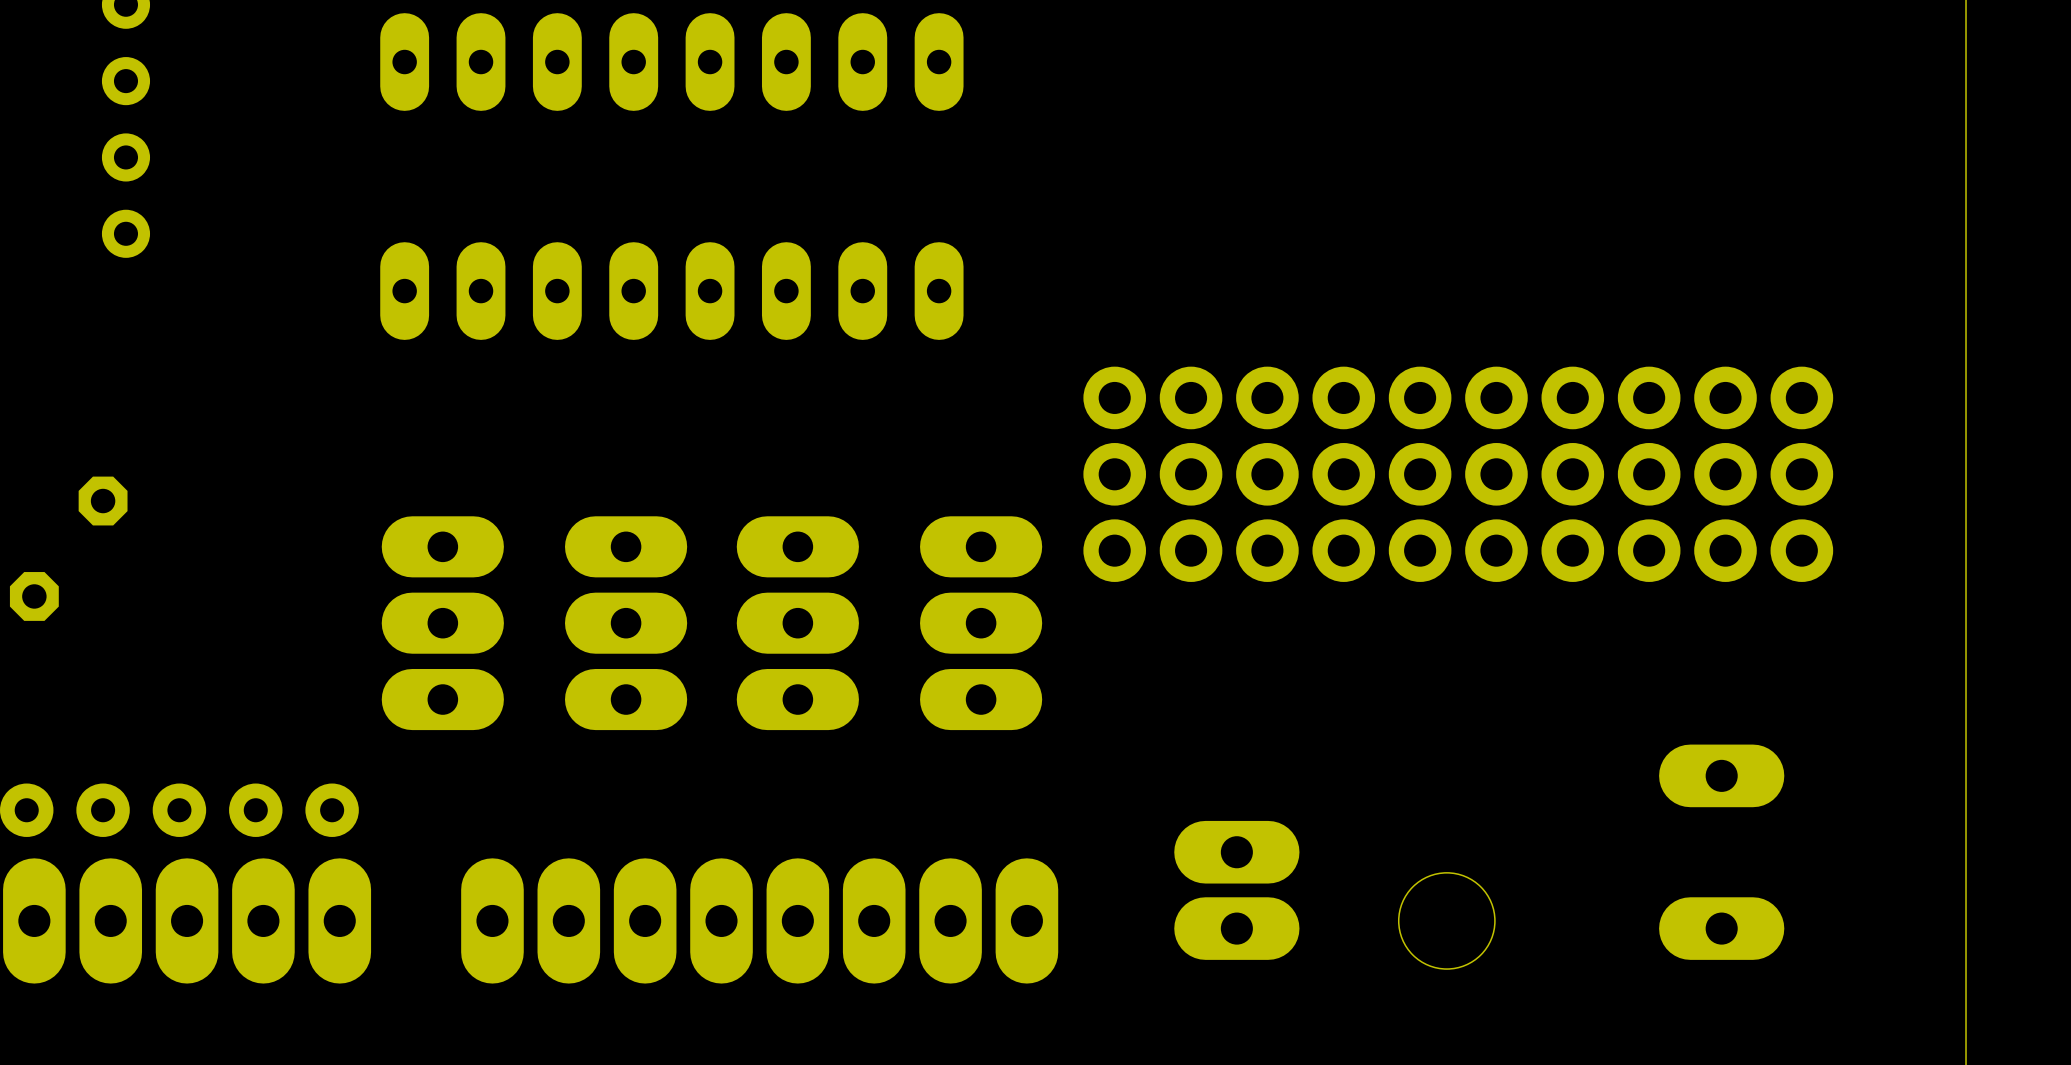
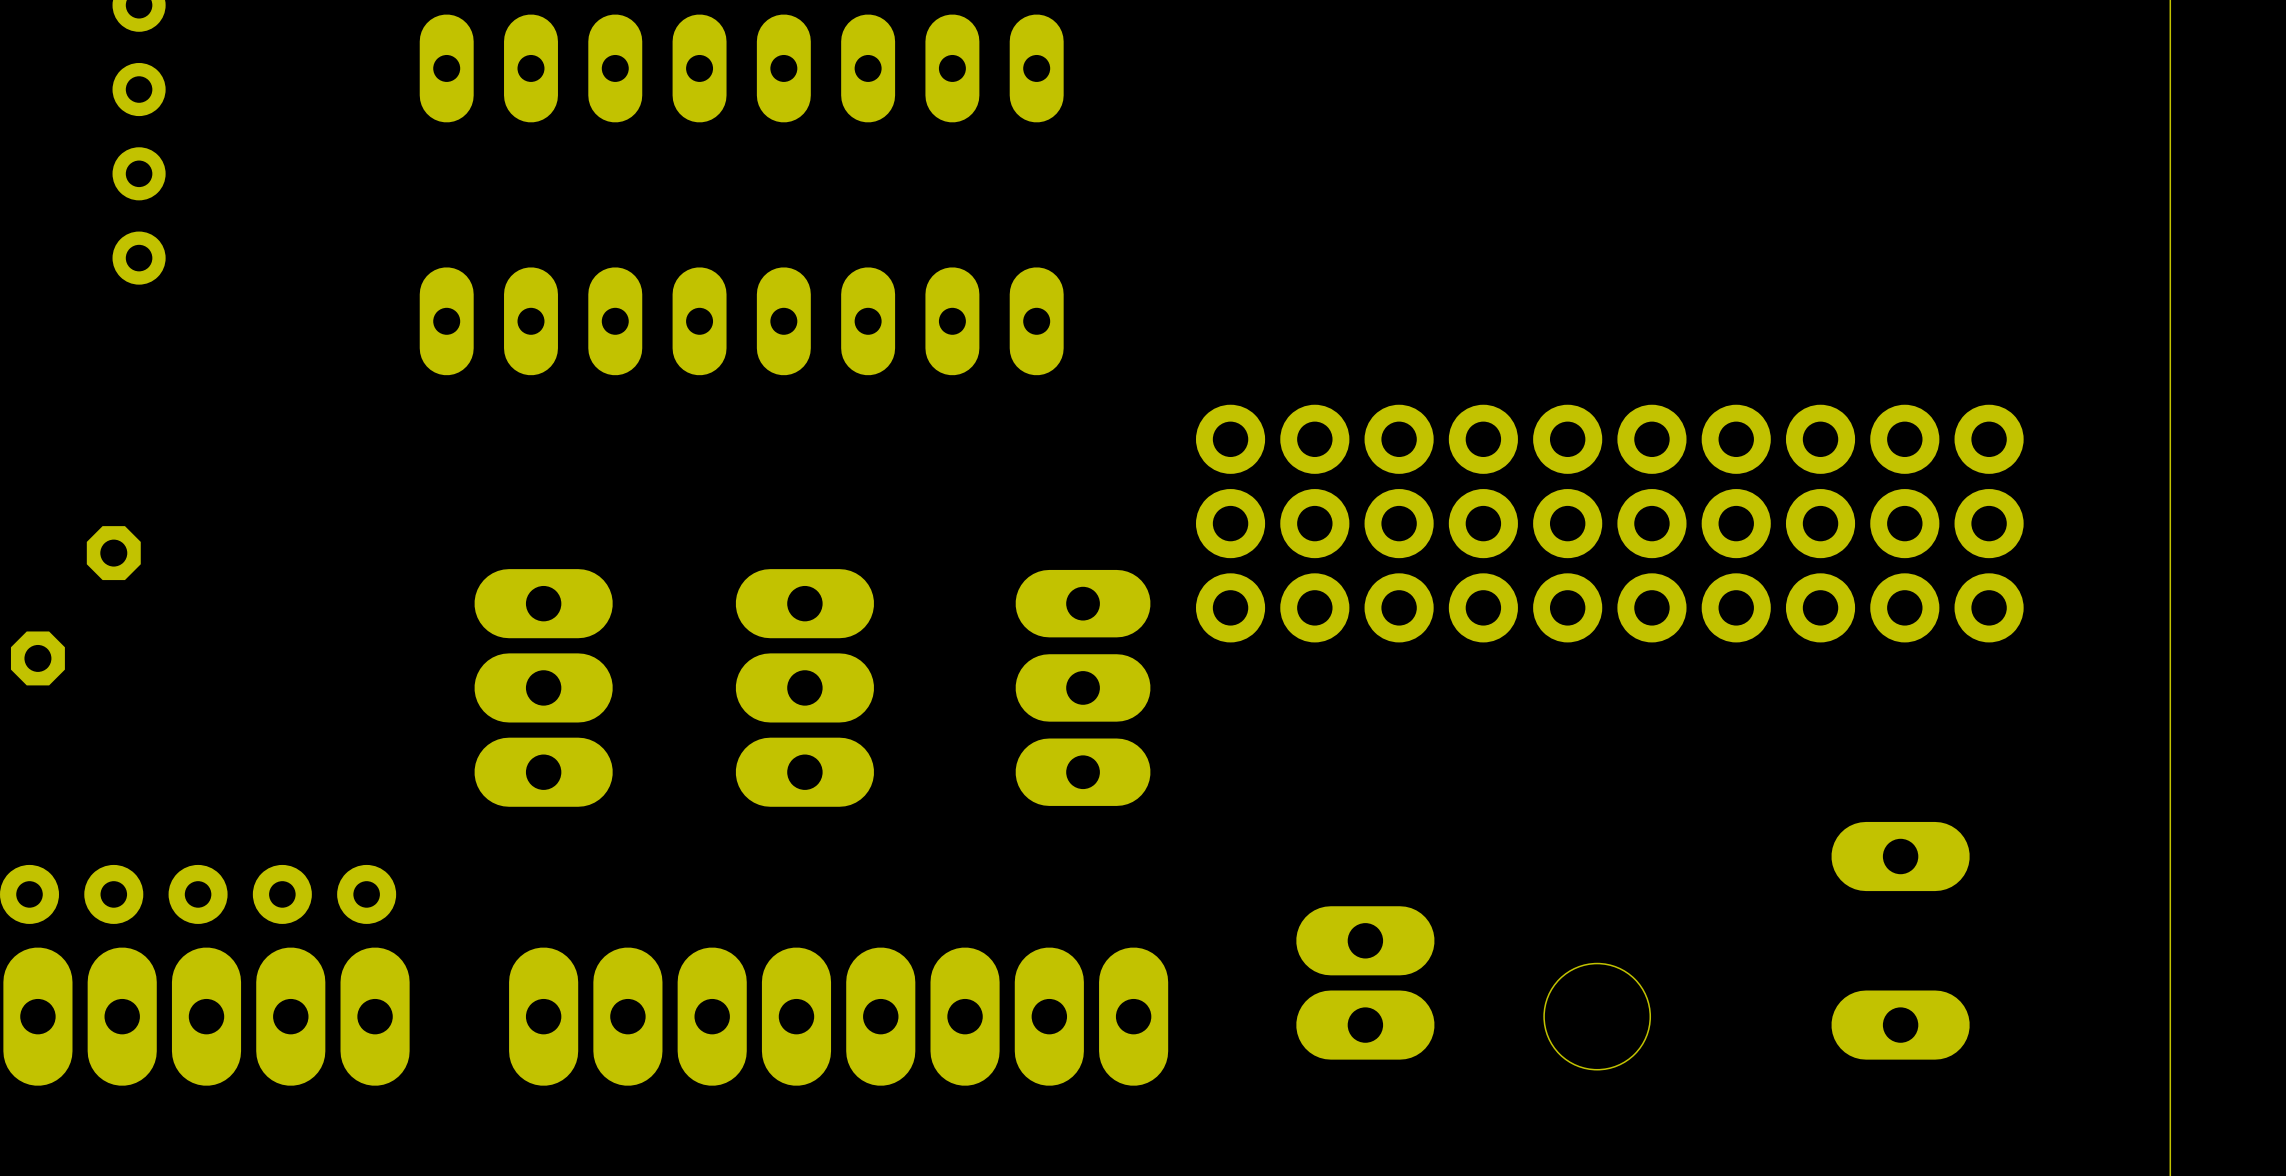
part: (442, 623) -> none
part: none -> (543, 687)
part: (626, 623) -> none
part: none -> (804, 687)
part: (797, 623) -> none

